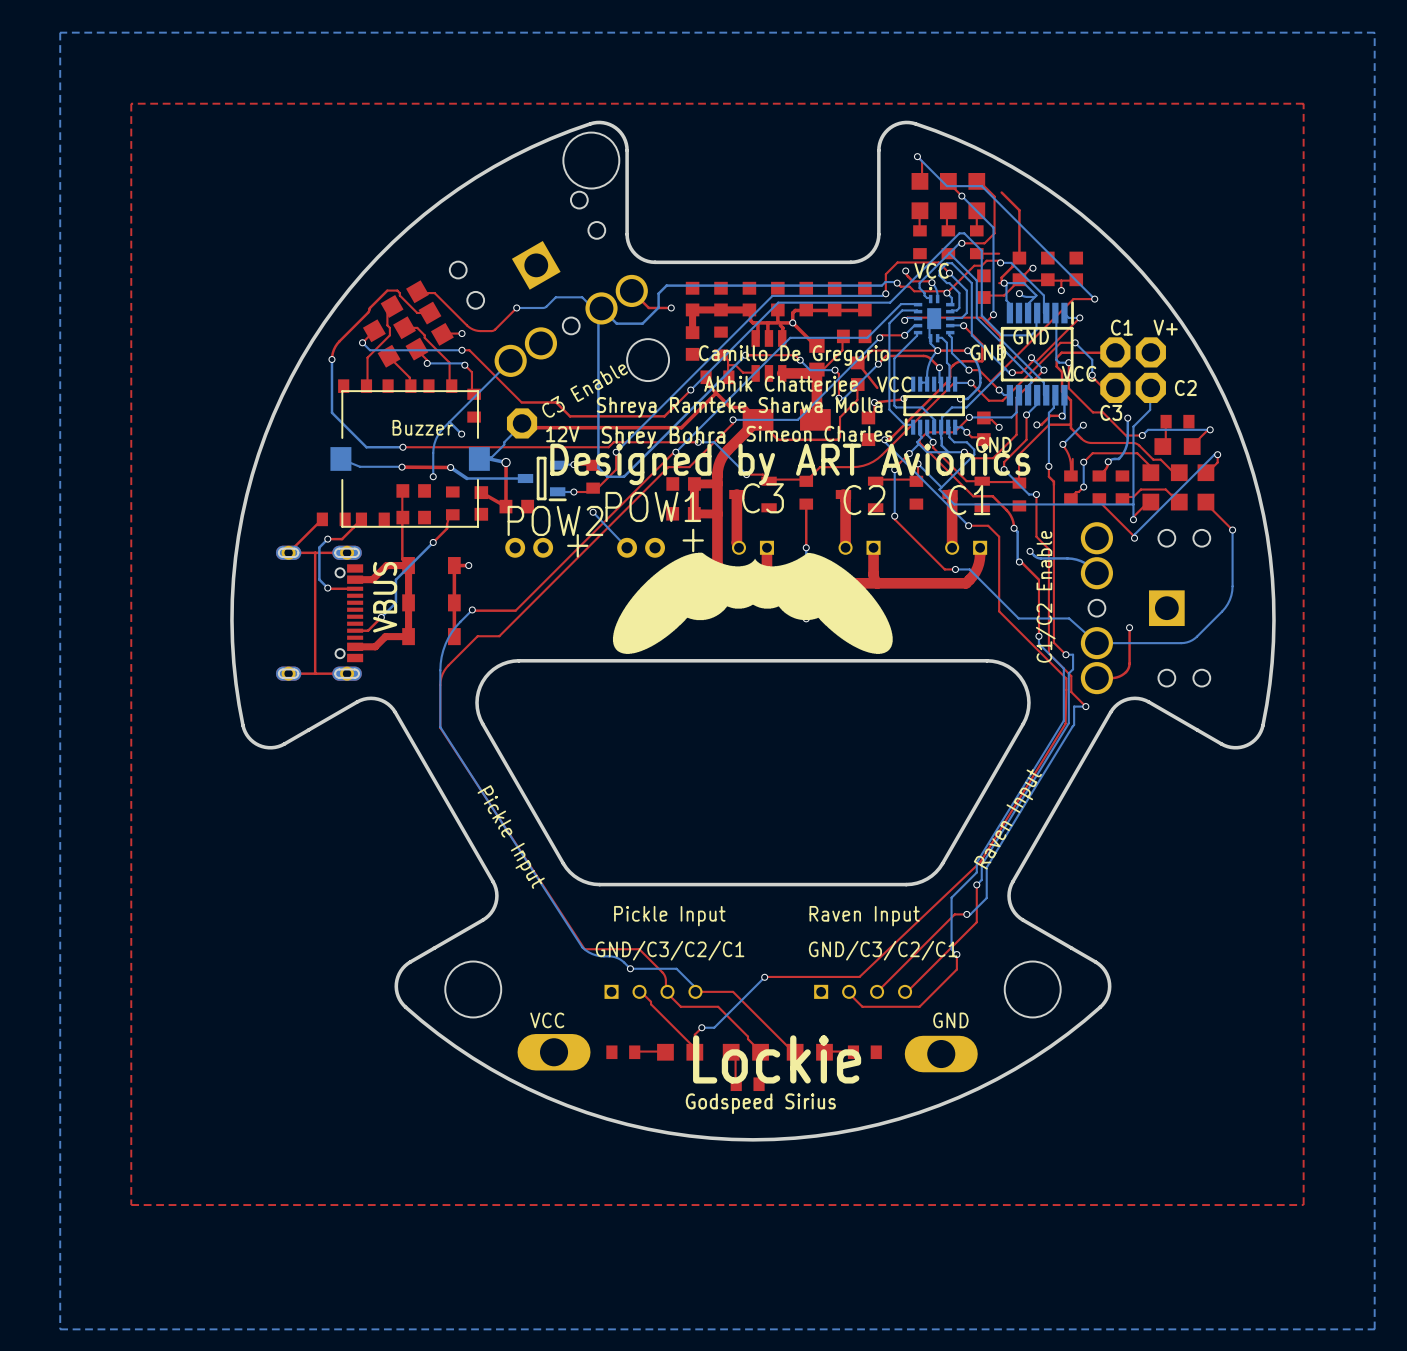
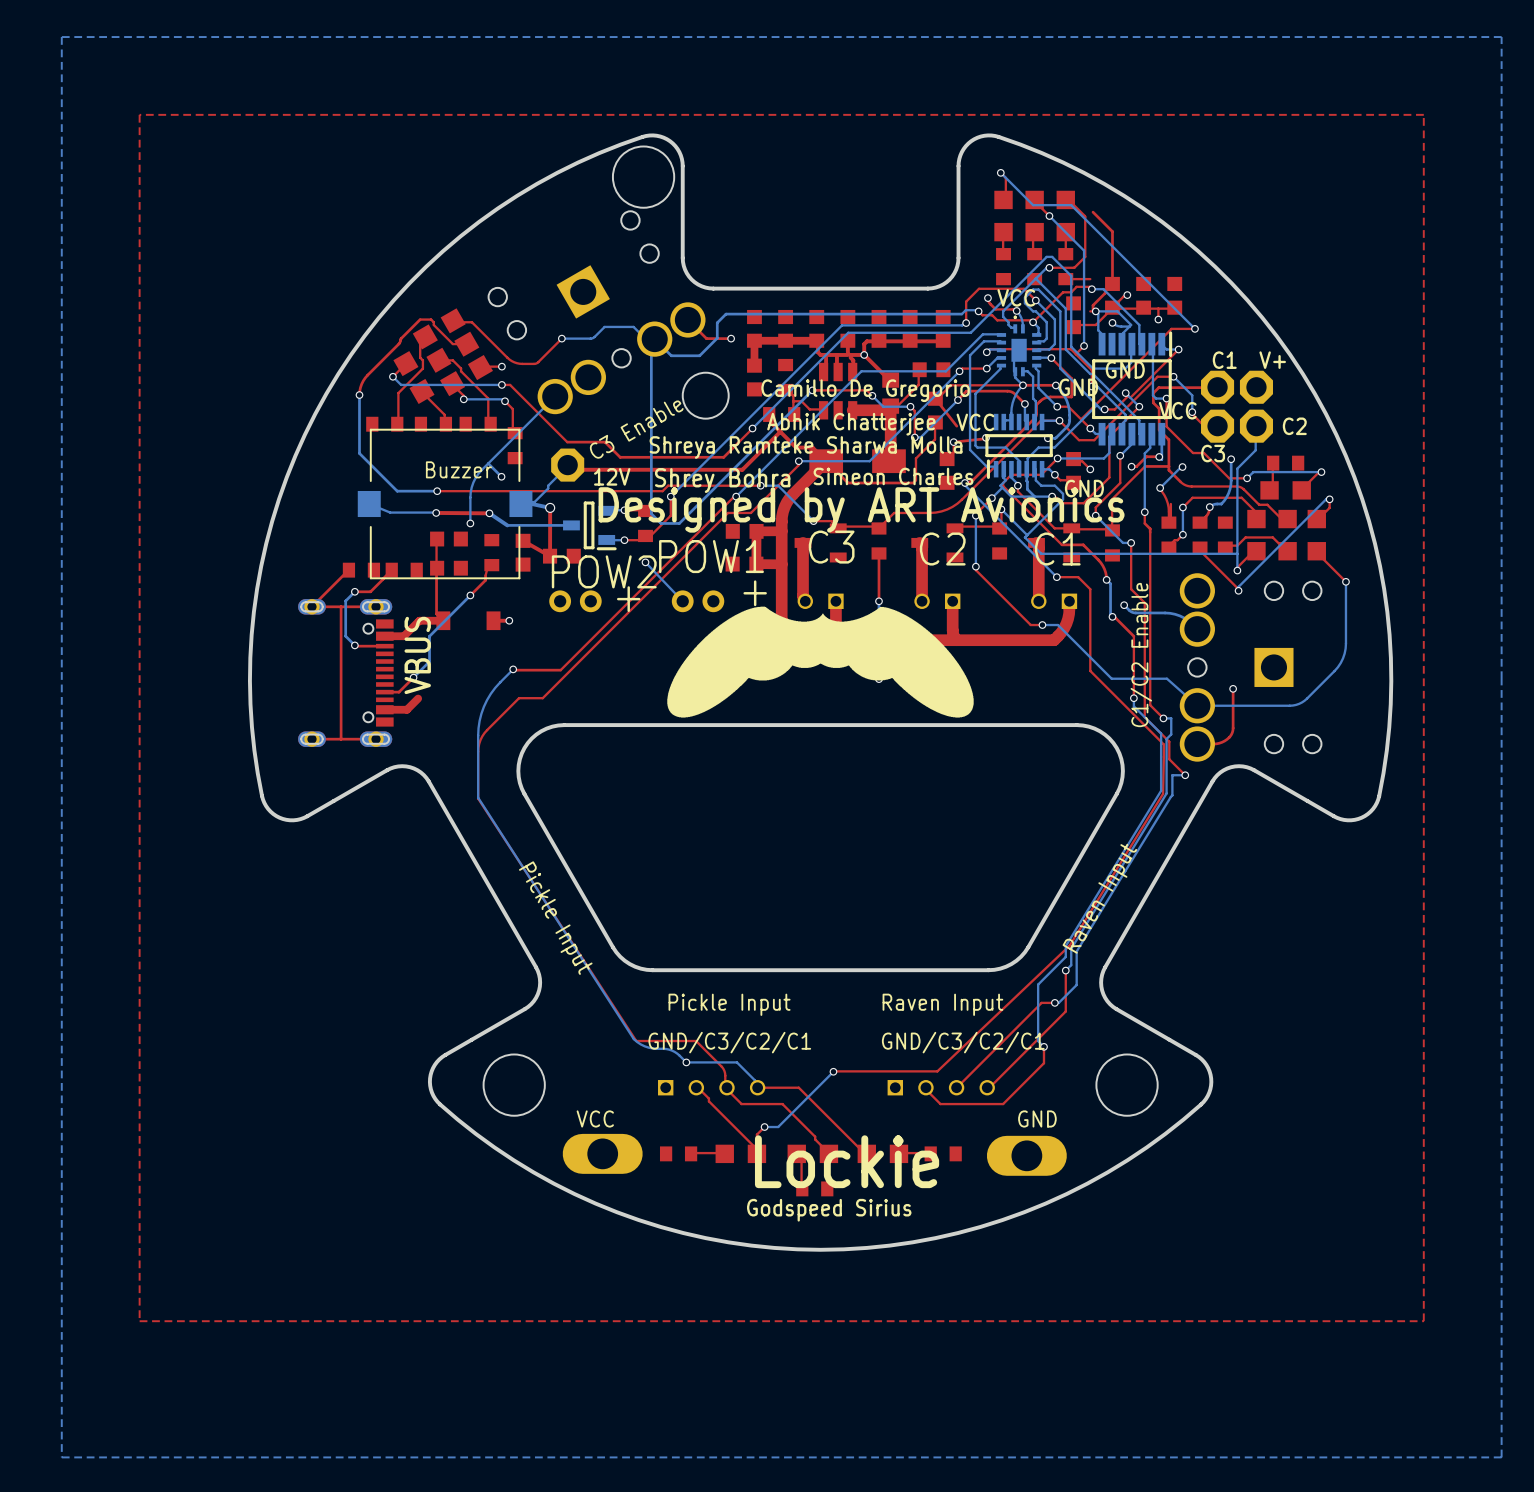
top track: (408, 565) (408, 636) (385, 636) -> none
top track: (454, 565) (454, 636) -> none
part: (431, 602) -> none
part: (431, 636) -> none

